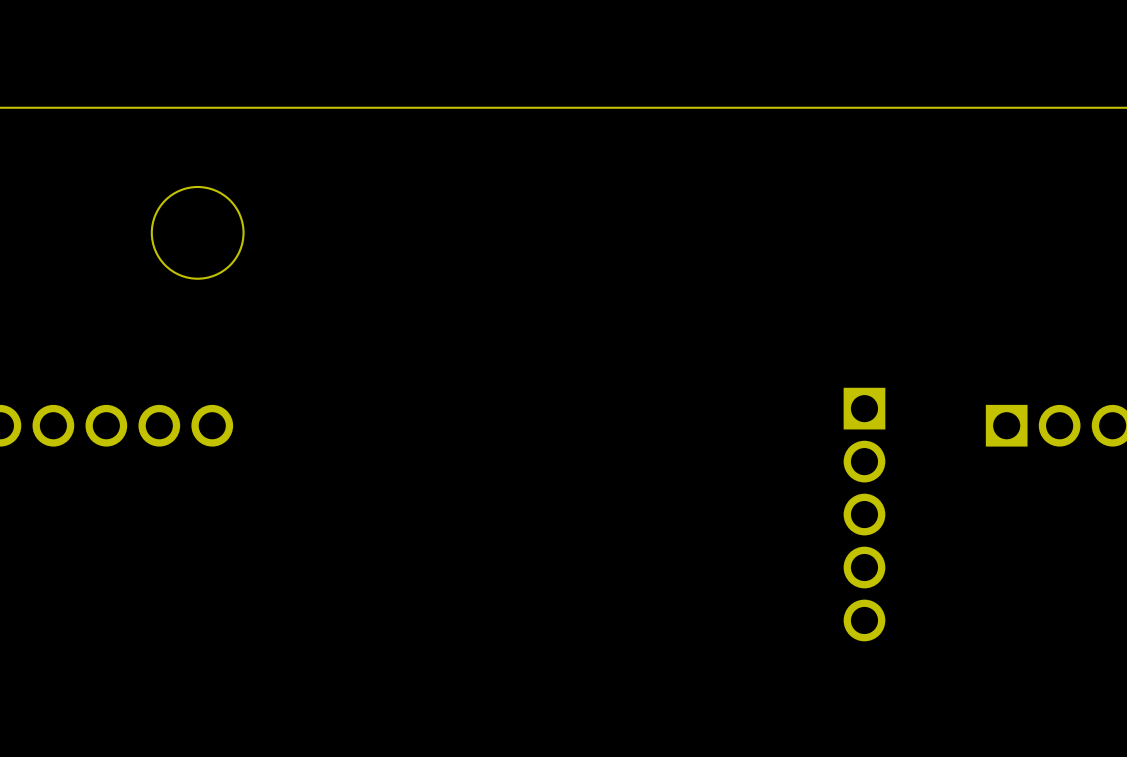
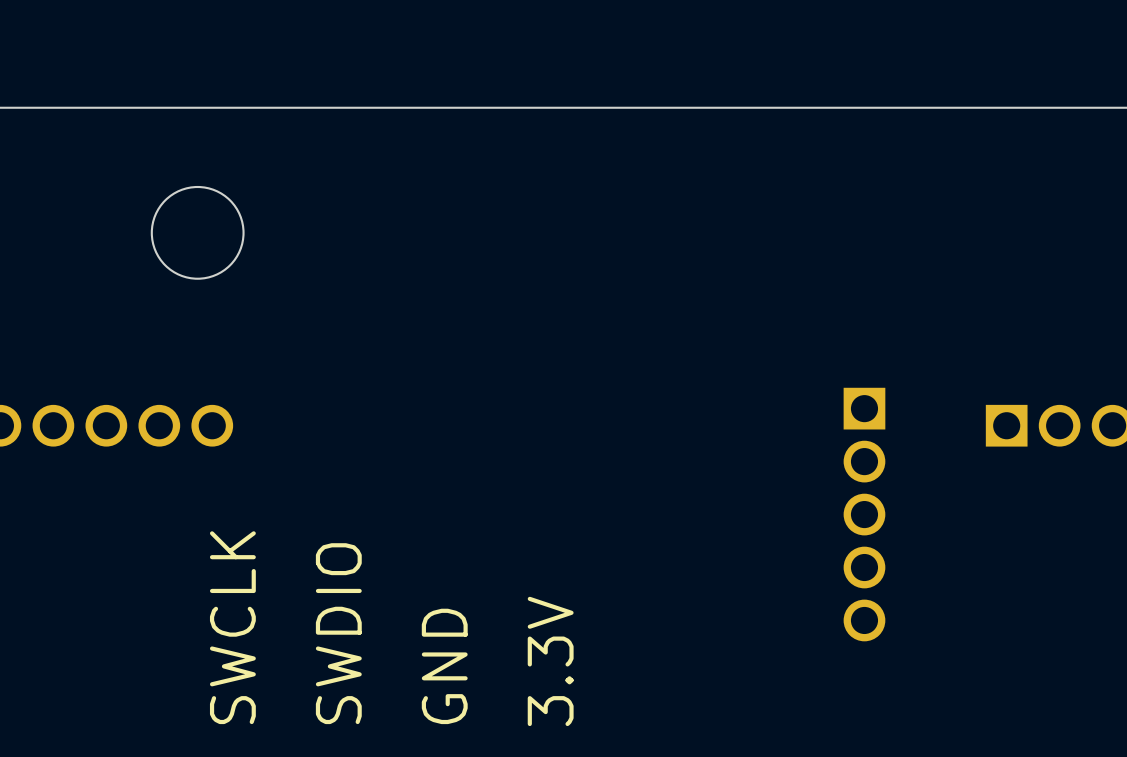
text: none -> SWCLK (232, 627)
text: none -> SWDIO (338, 633)
text: none -> 3.3V (550, 661)
text: none -> GND (444, 666)

